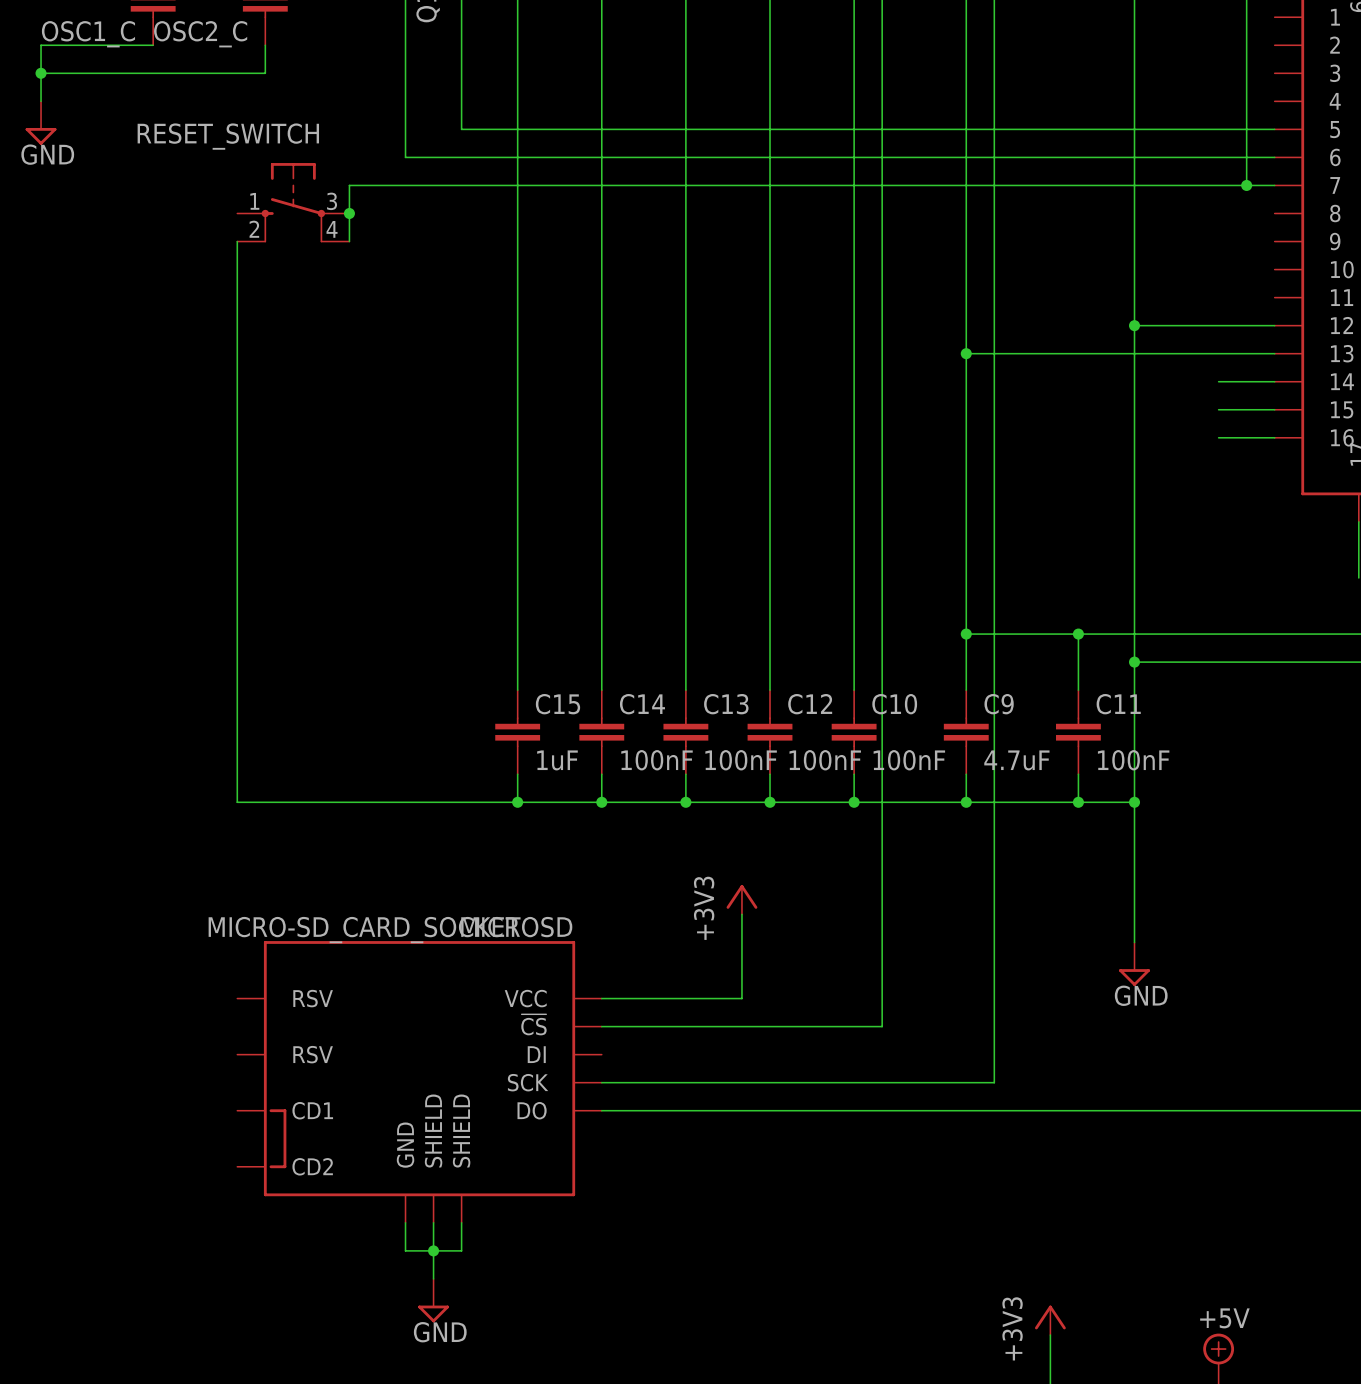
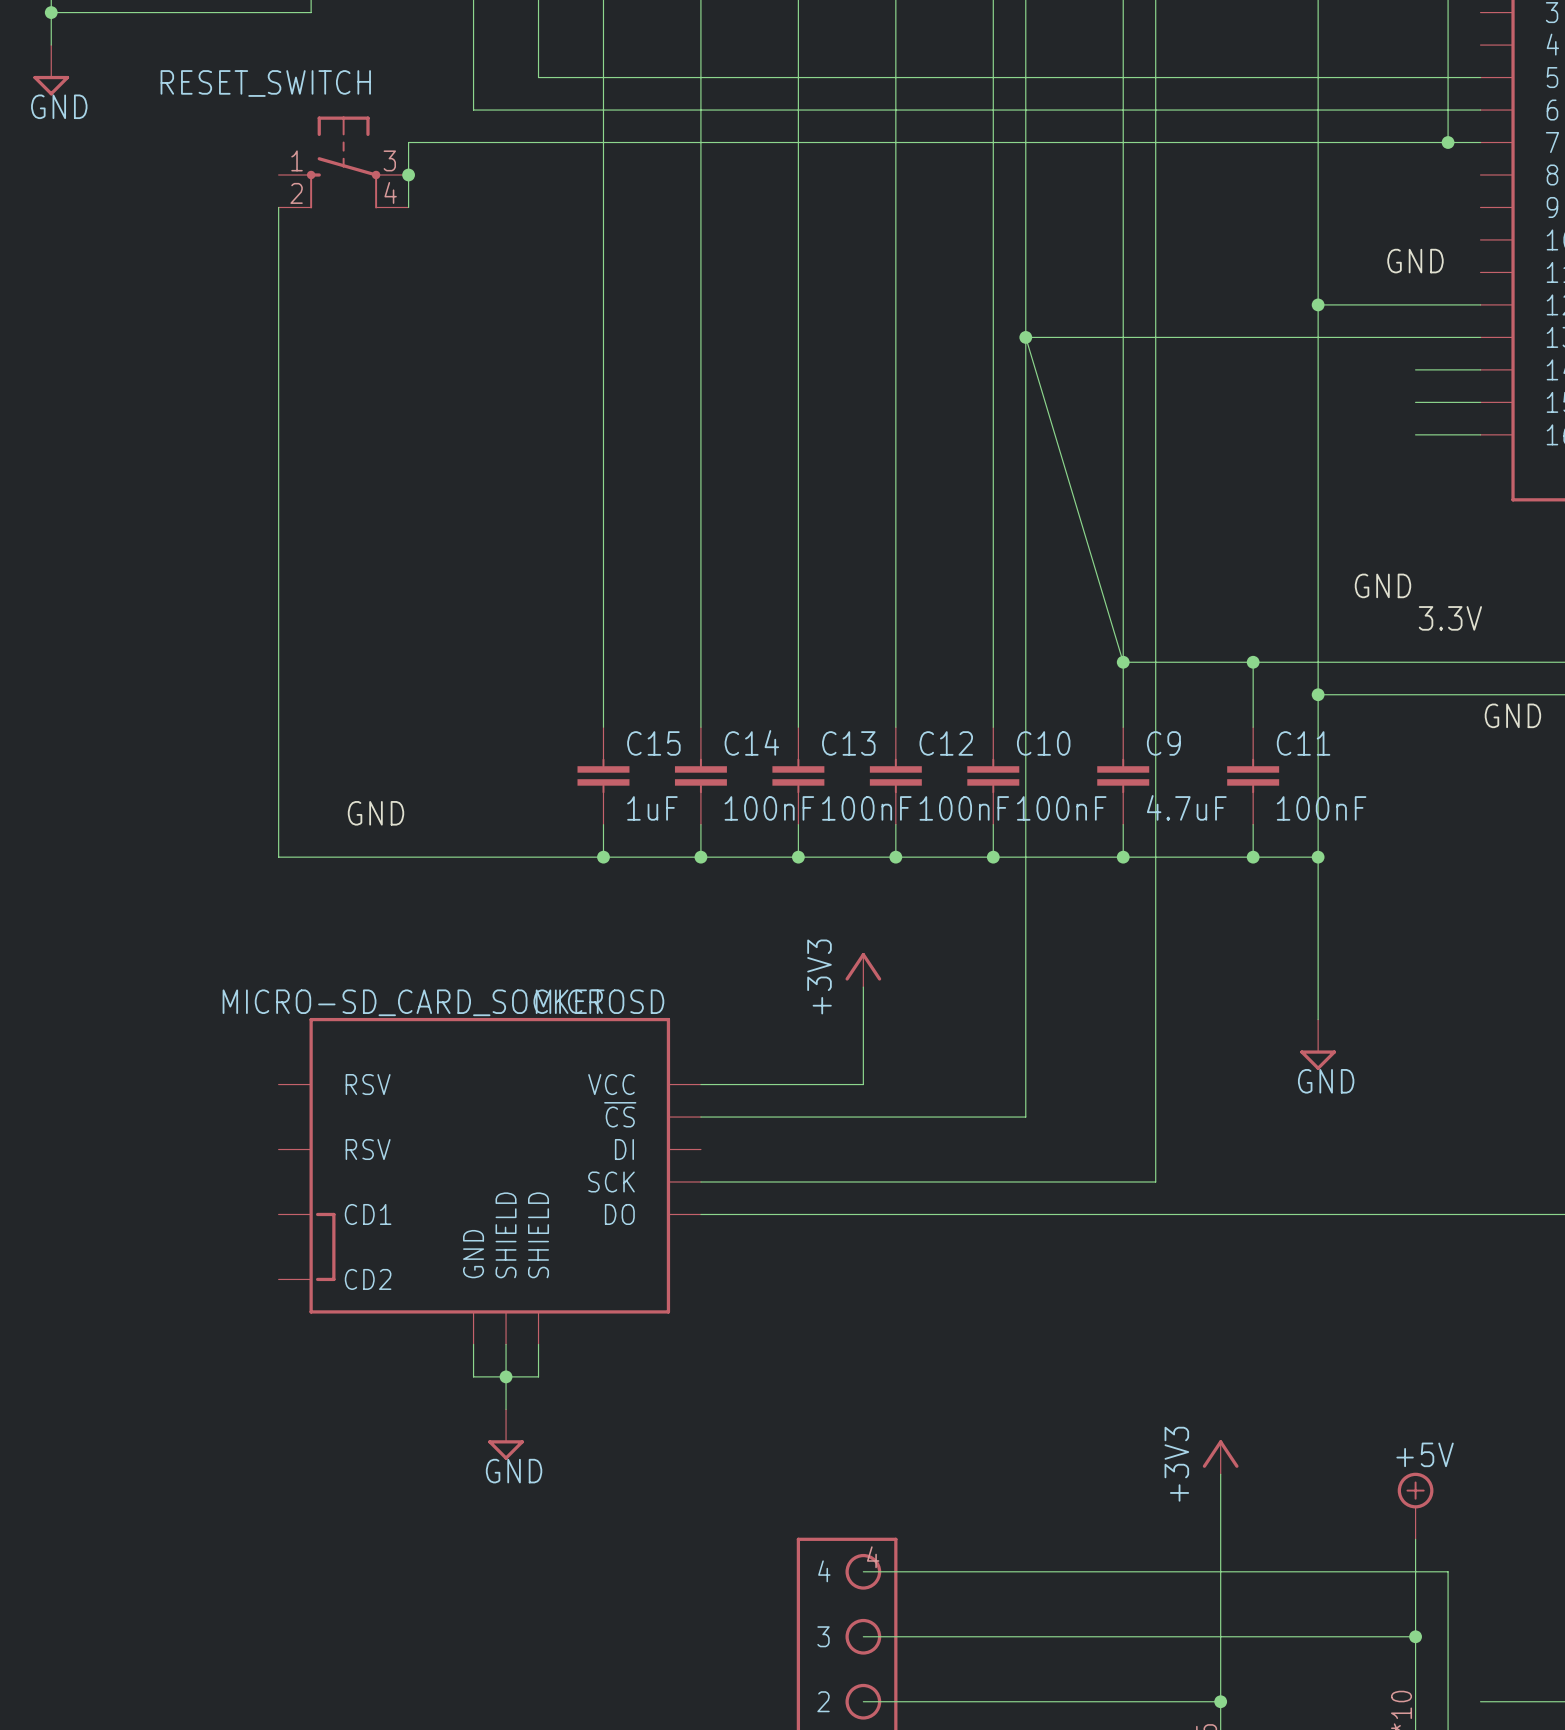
label: none -> GND (1415, 261)
junction: none -> (1025, 337)
wire: none -> (1123, 337) (1025, 337) (1123, 662)
junction: (966, 353) -> none
label: none -> GND (1382, 585)
label: none -> 3.3V (1450, 618)
label: none -> GND (1512, 715)
label: none -> GND (376, 813)

